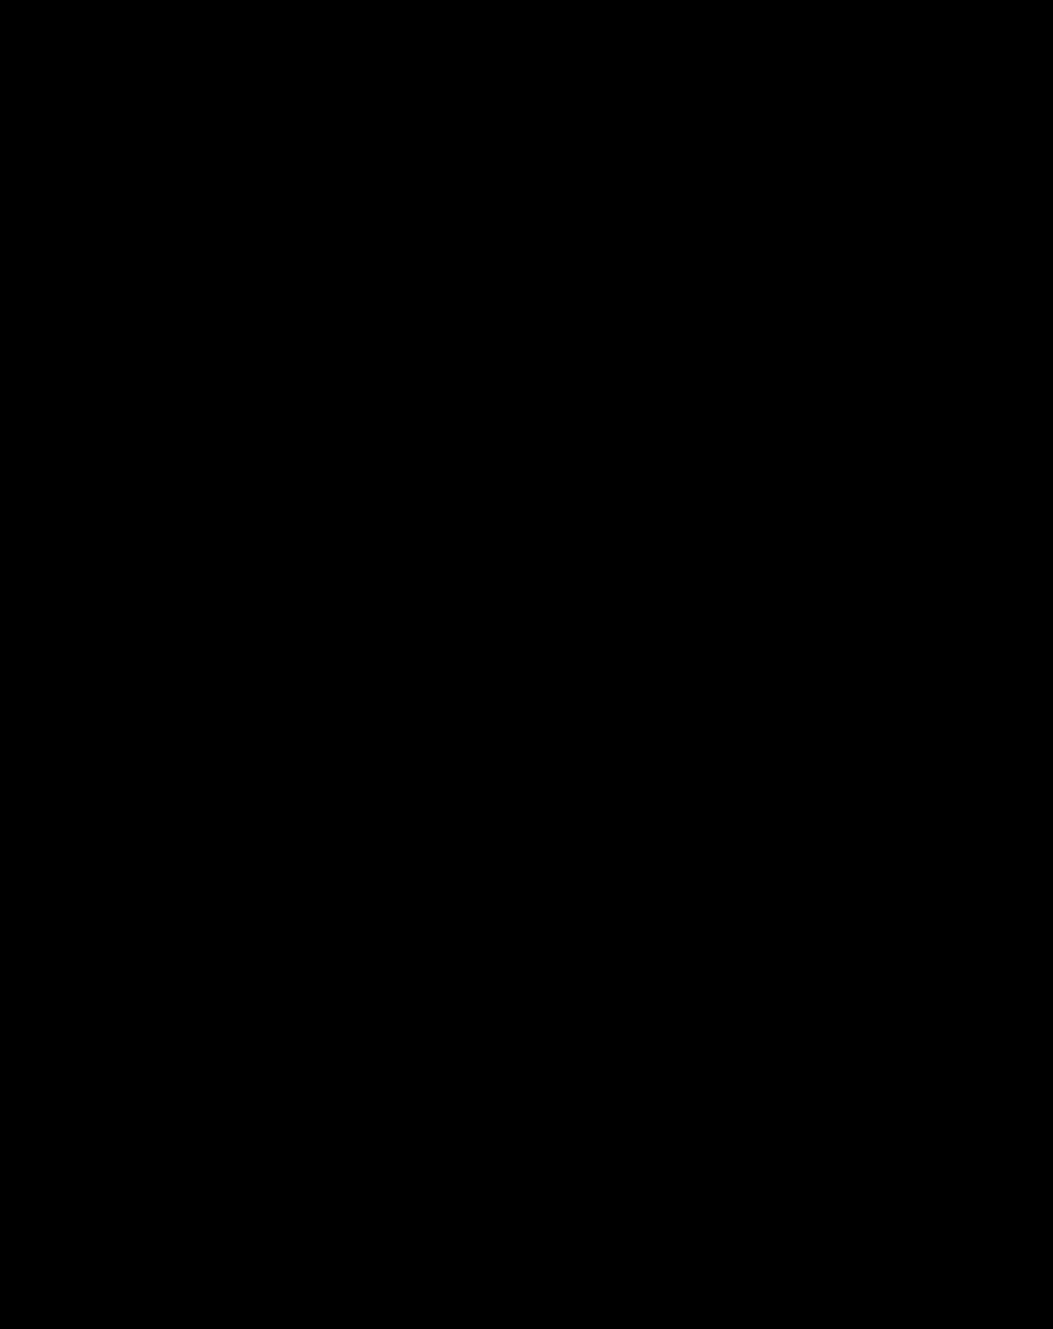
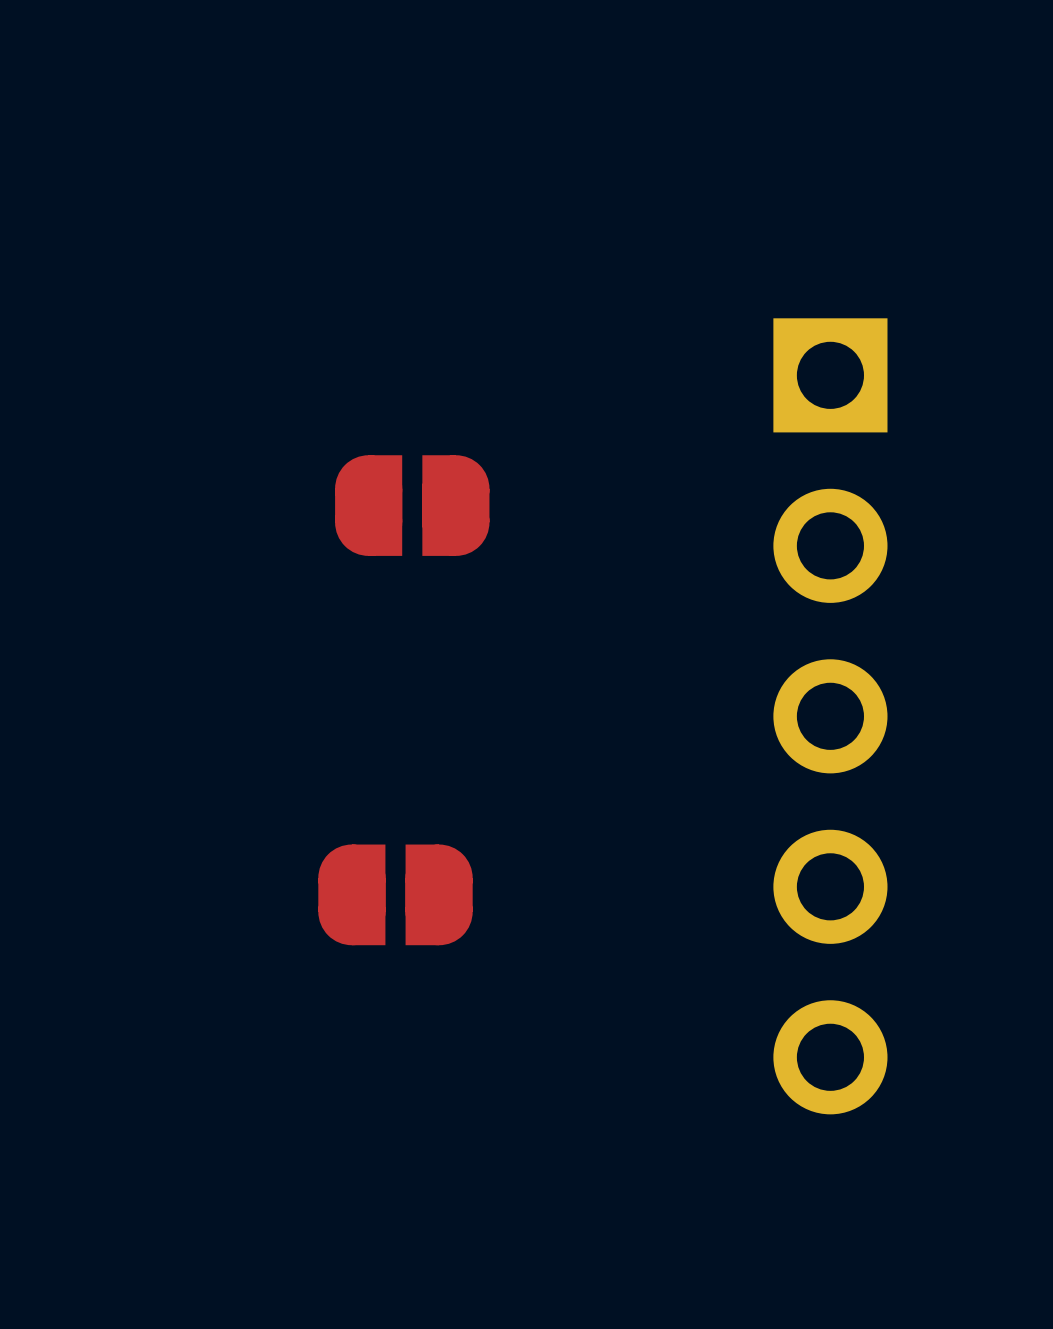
part: none -> (412, 505)
part: none -> (830, 716)
part: none -> (395, 894)

